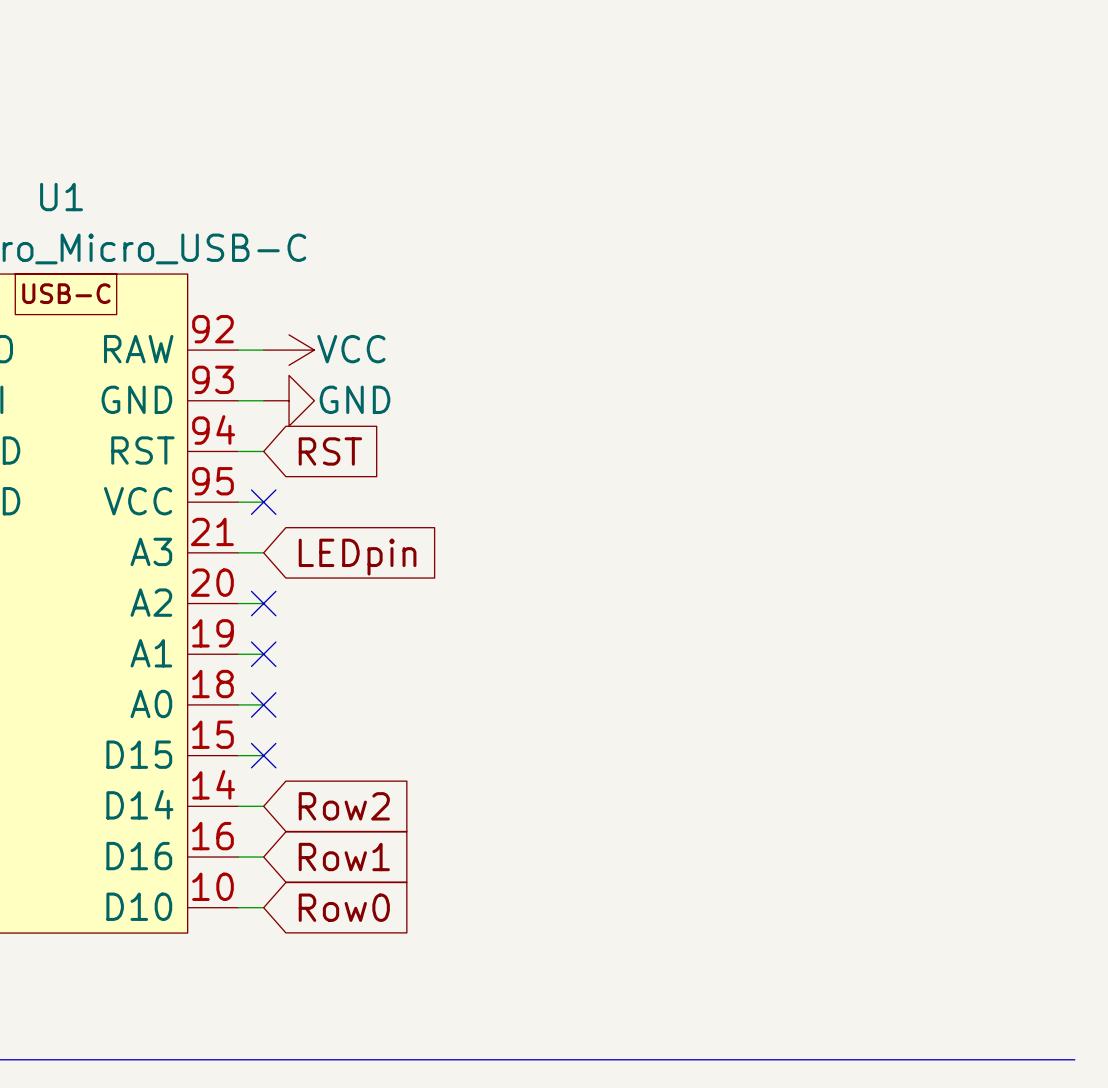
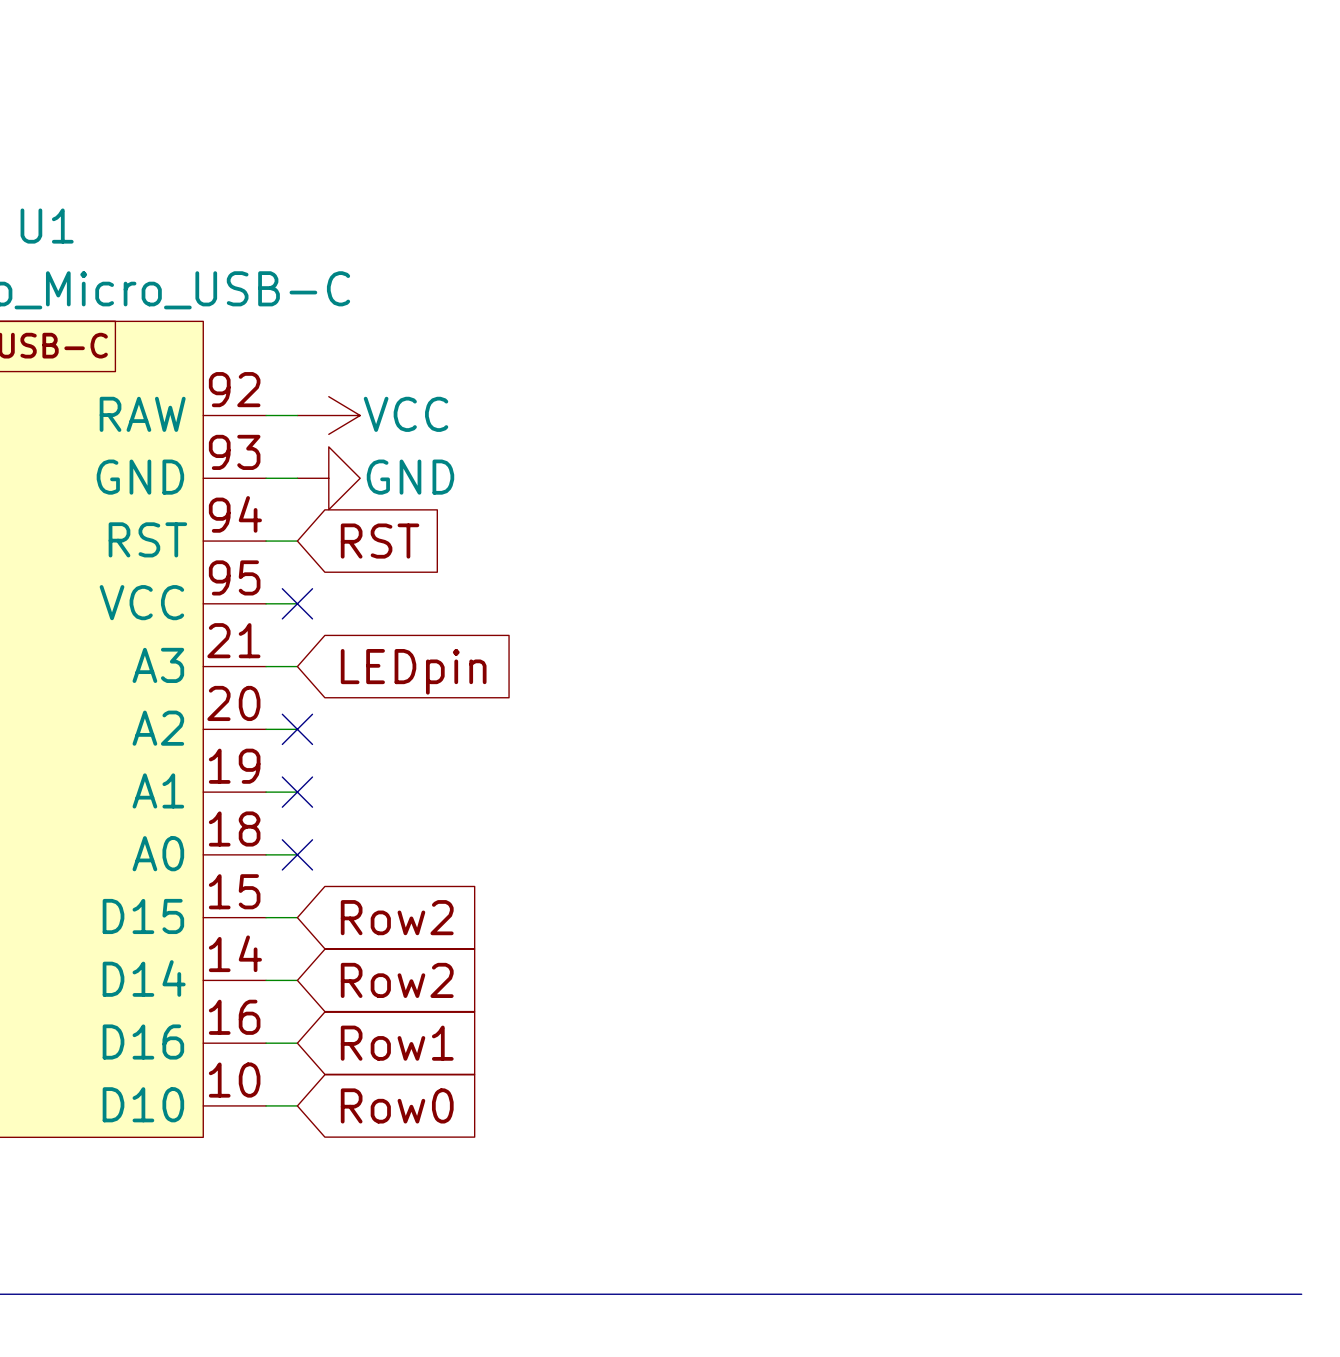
no-connect mark: (263, 755) -> none
global label: none -> Row2 (397, 917)

